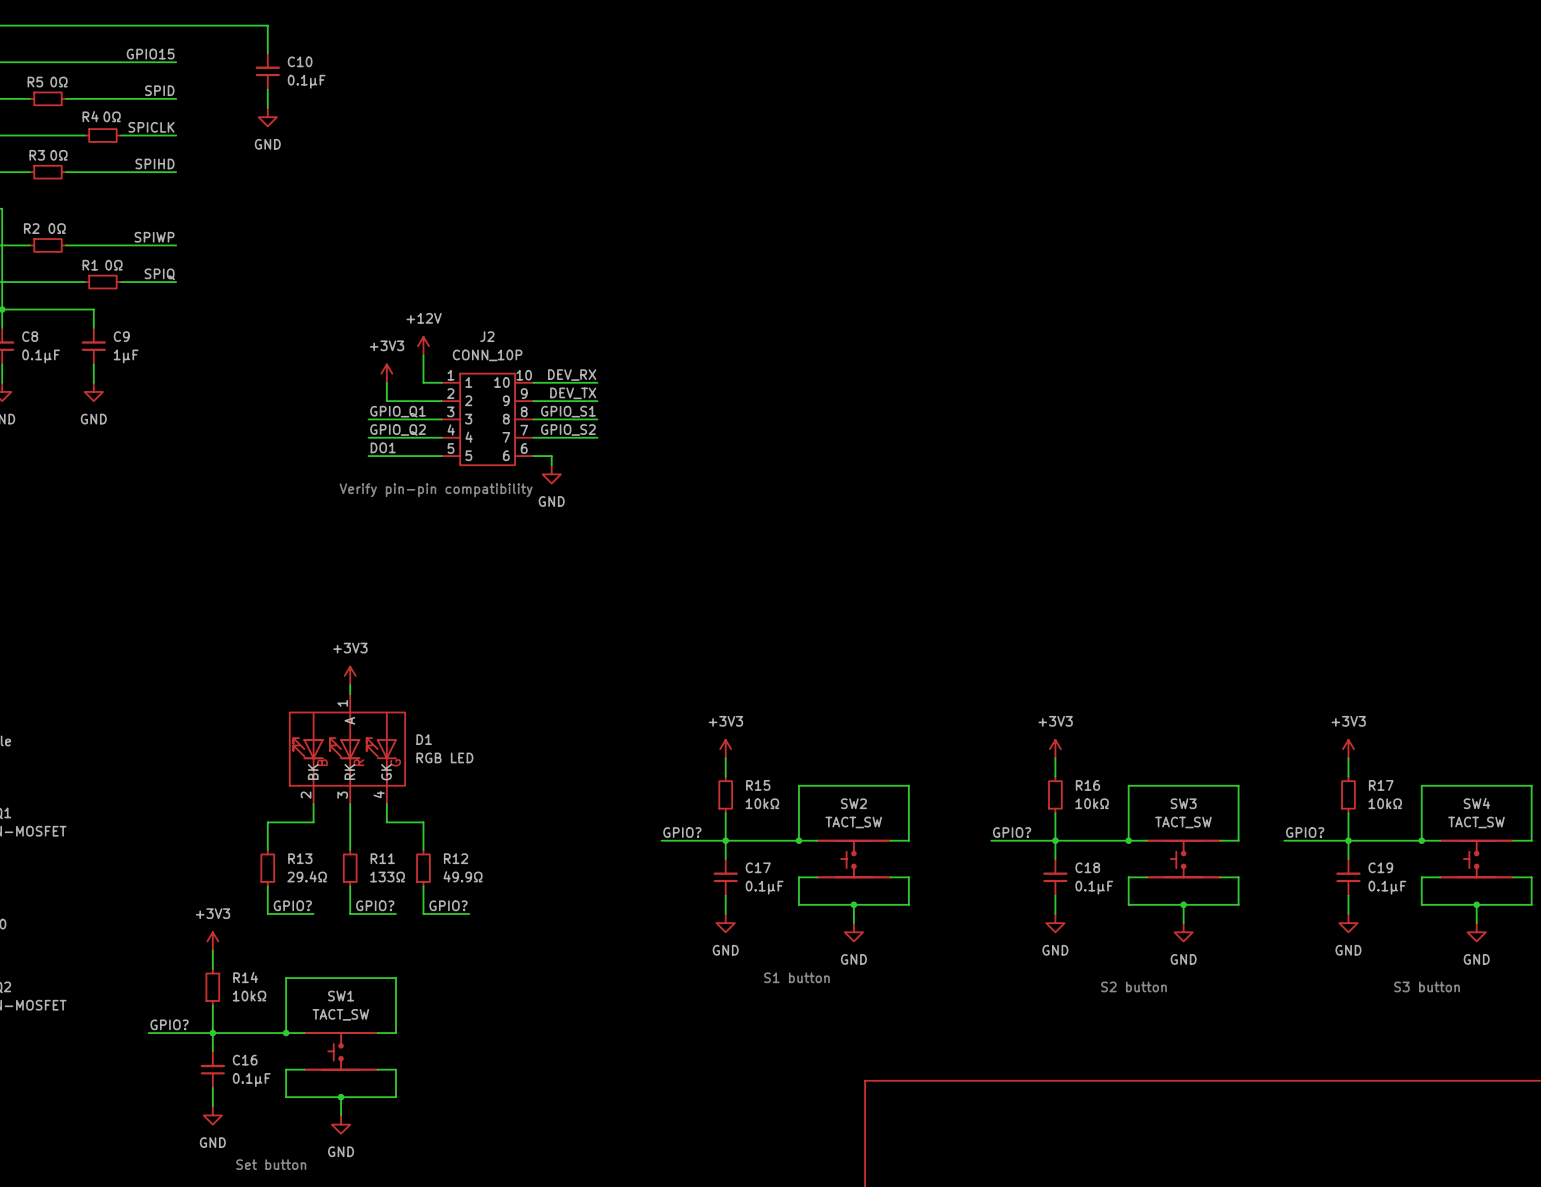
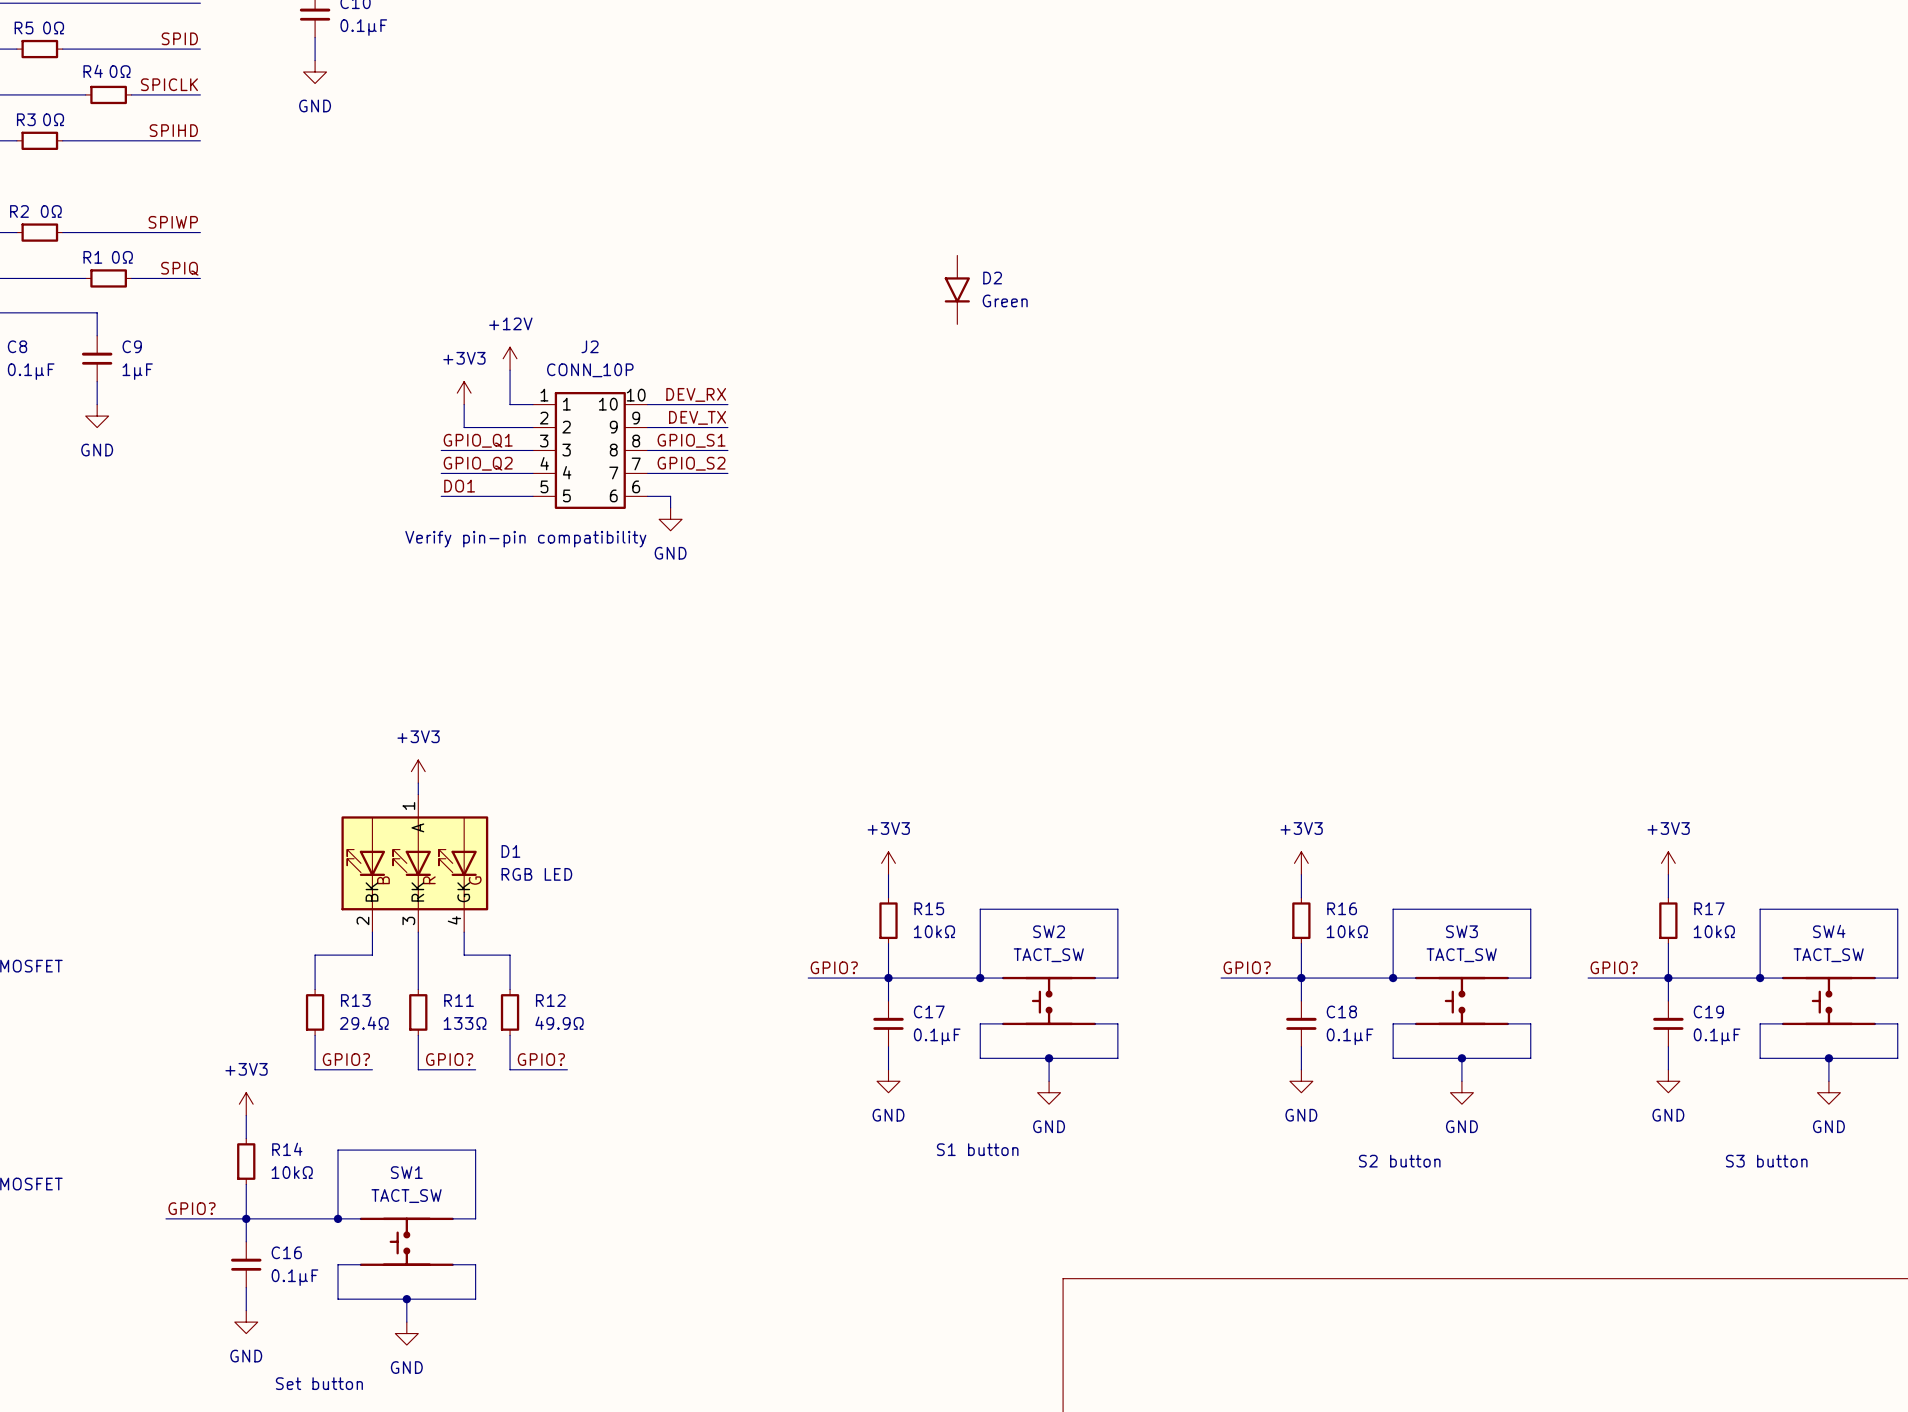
D2: none -> (957, 289)

